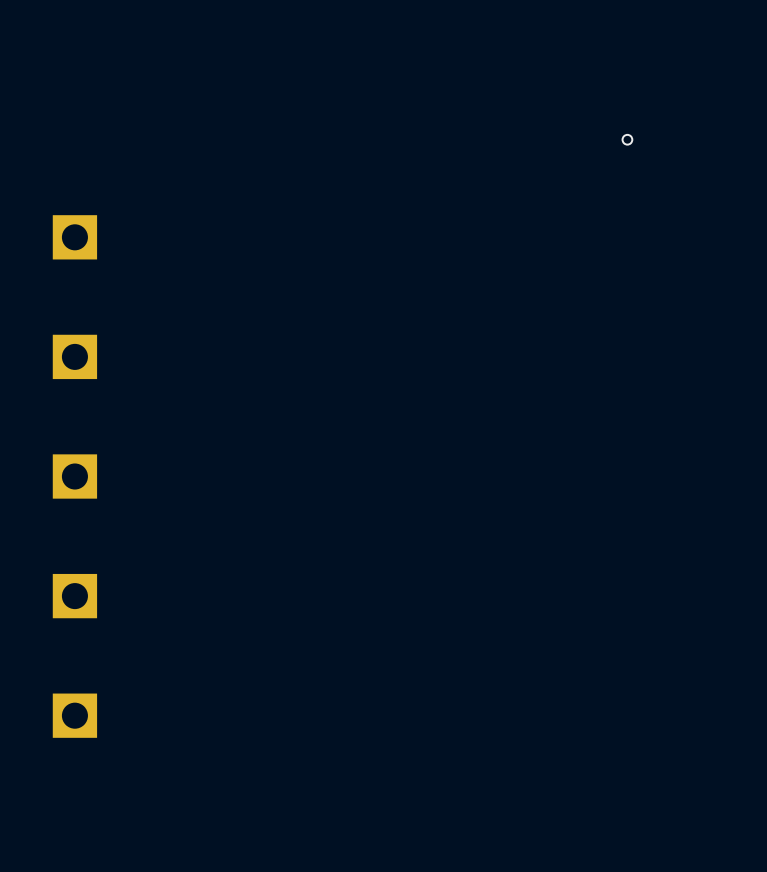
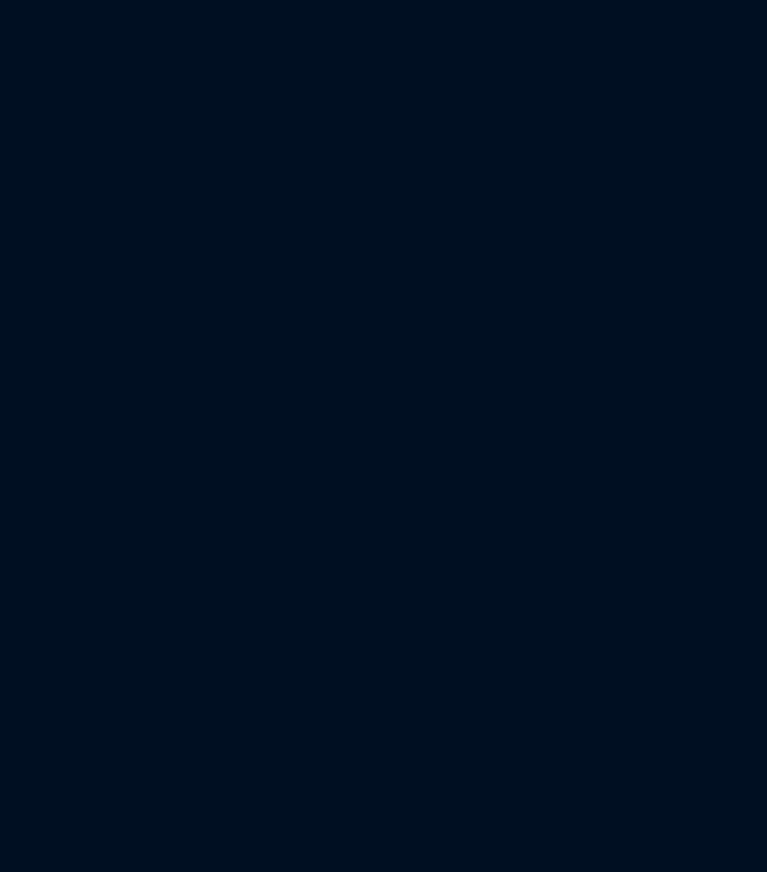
via: (627, 139) -> none
part: (74, 237) -> none
part: (74, 356) -> none
part: (74, 476) -> none
part: (74, 596) -> none
part: (74, 715) -> none

